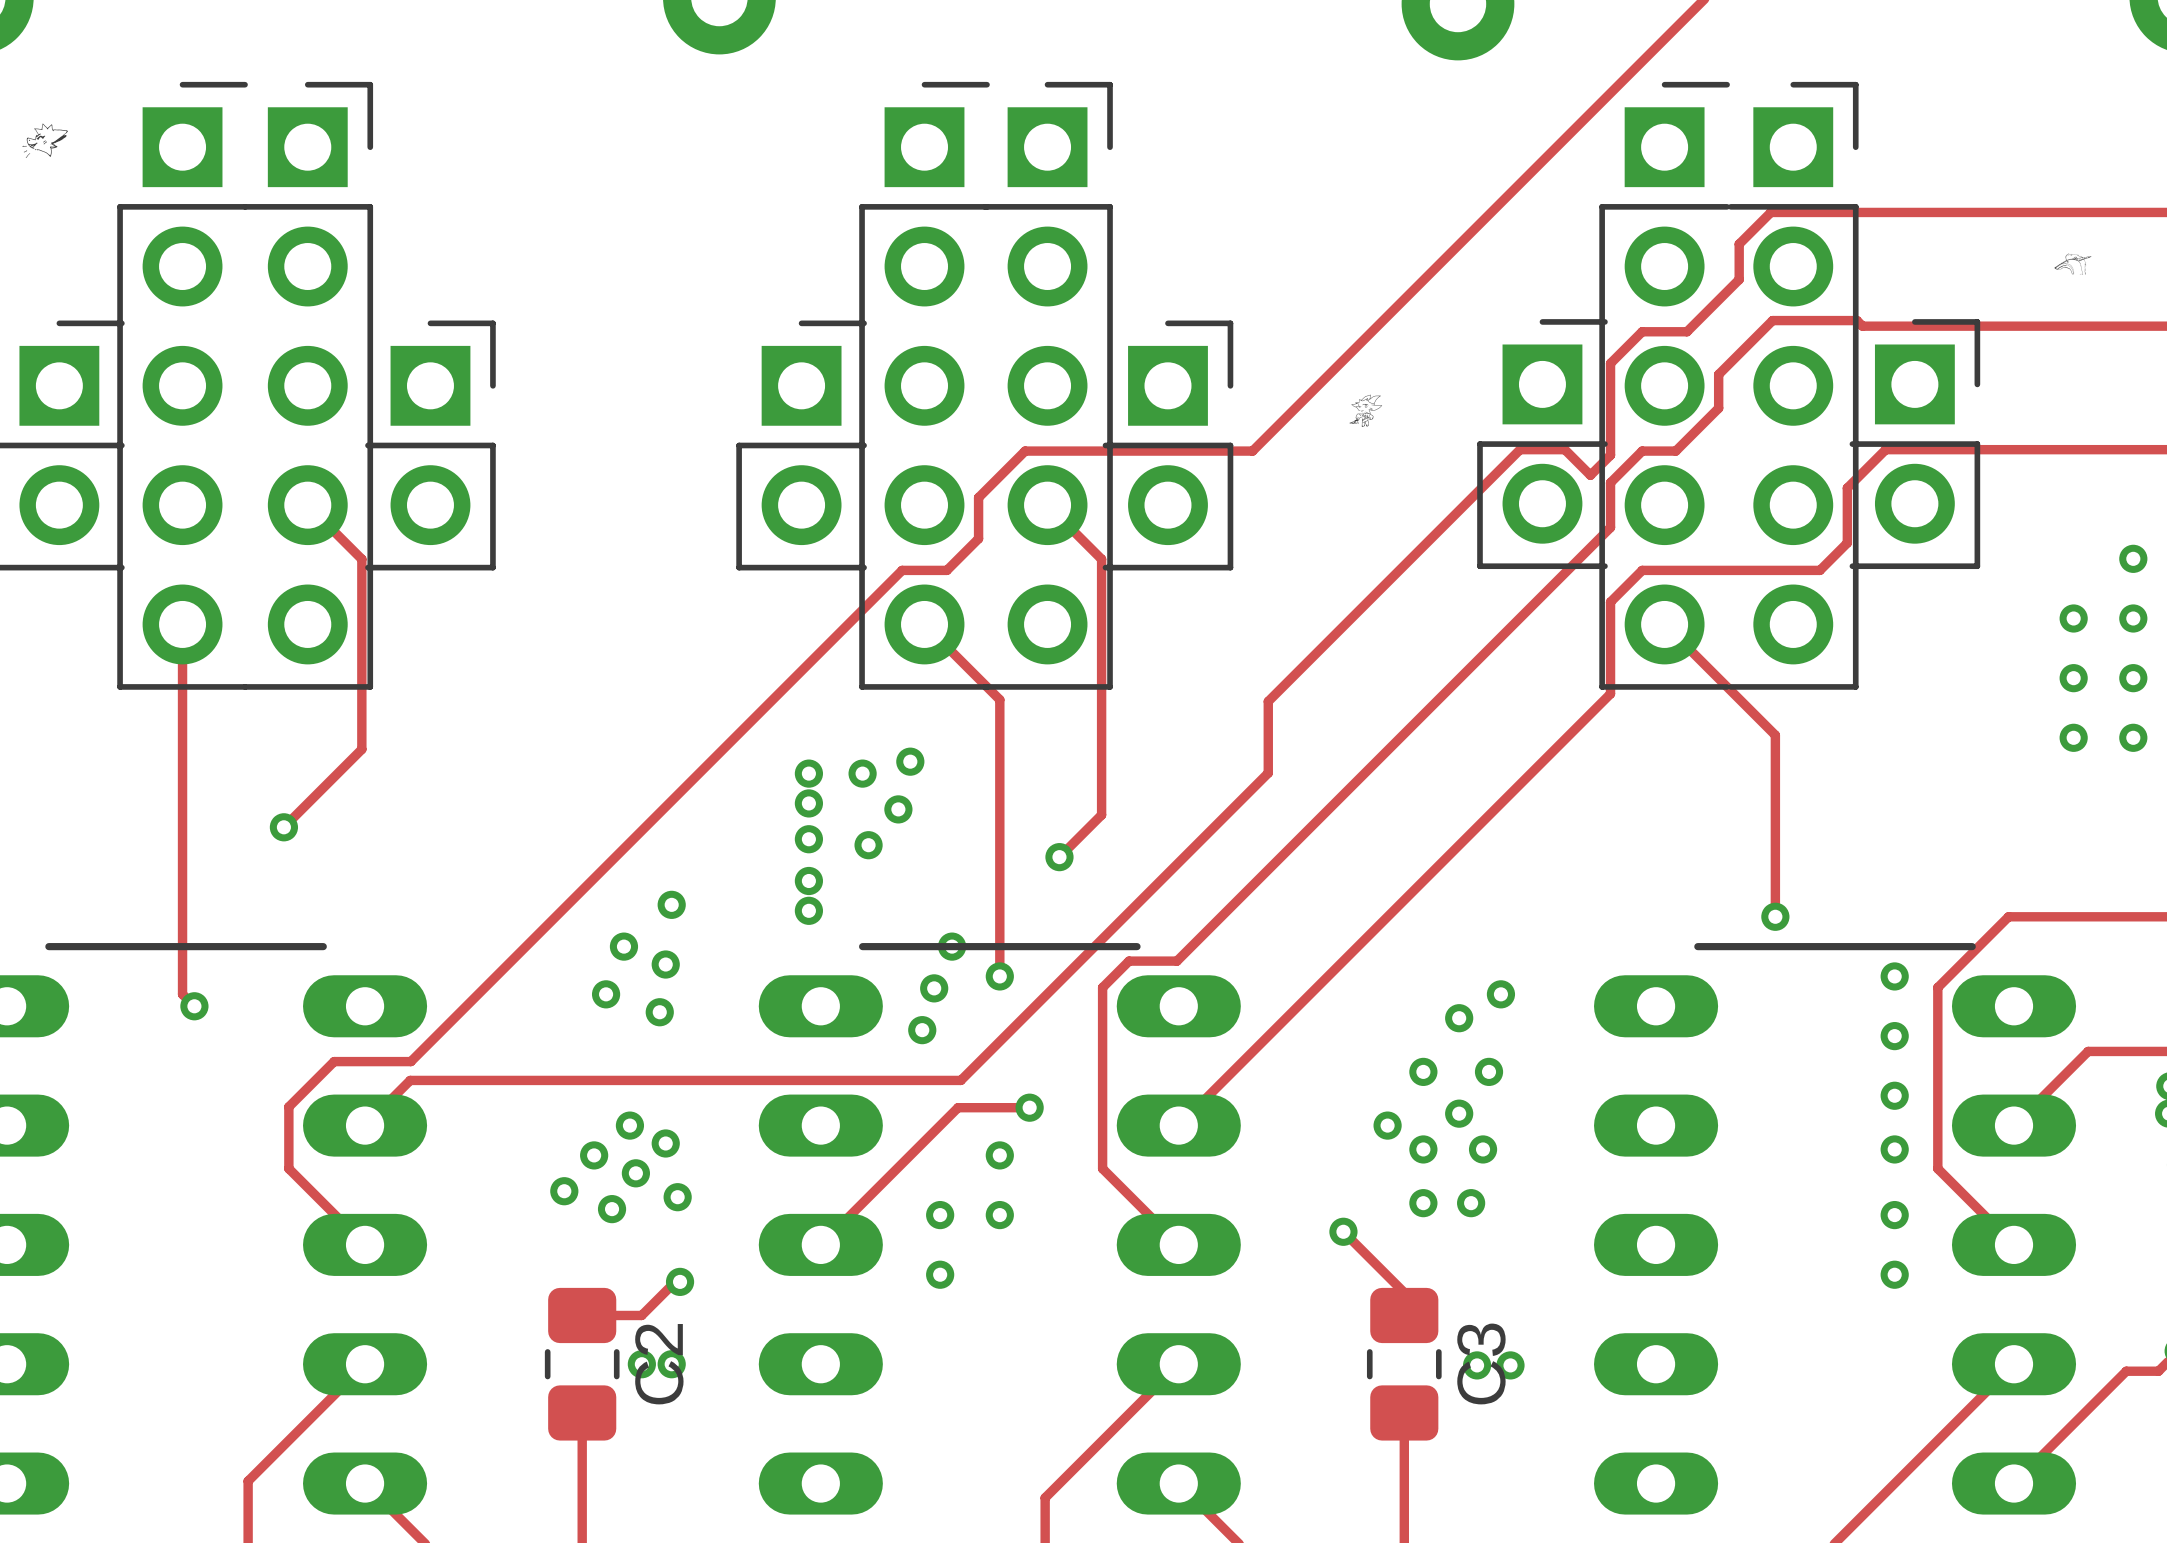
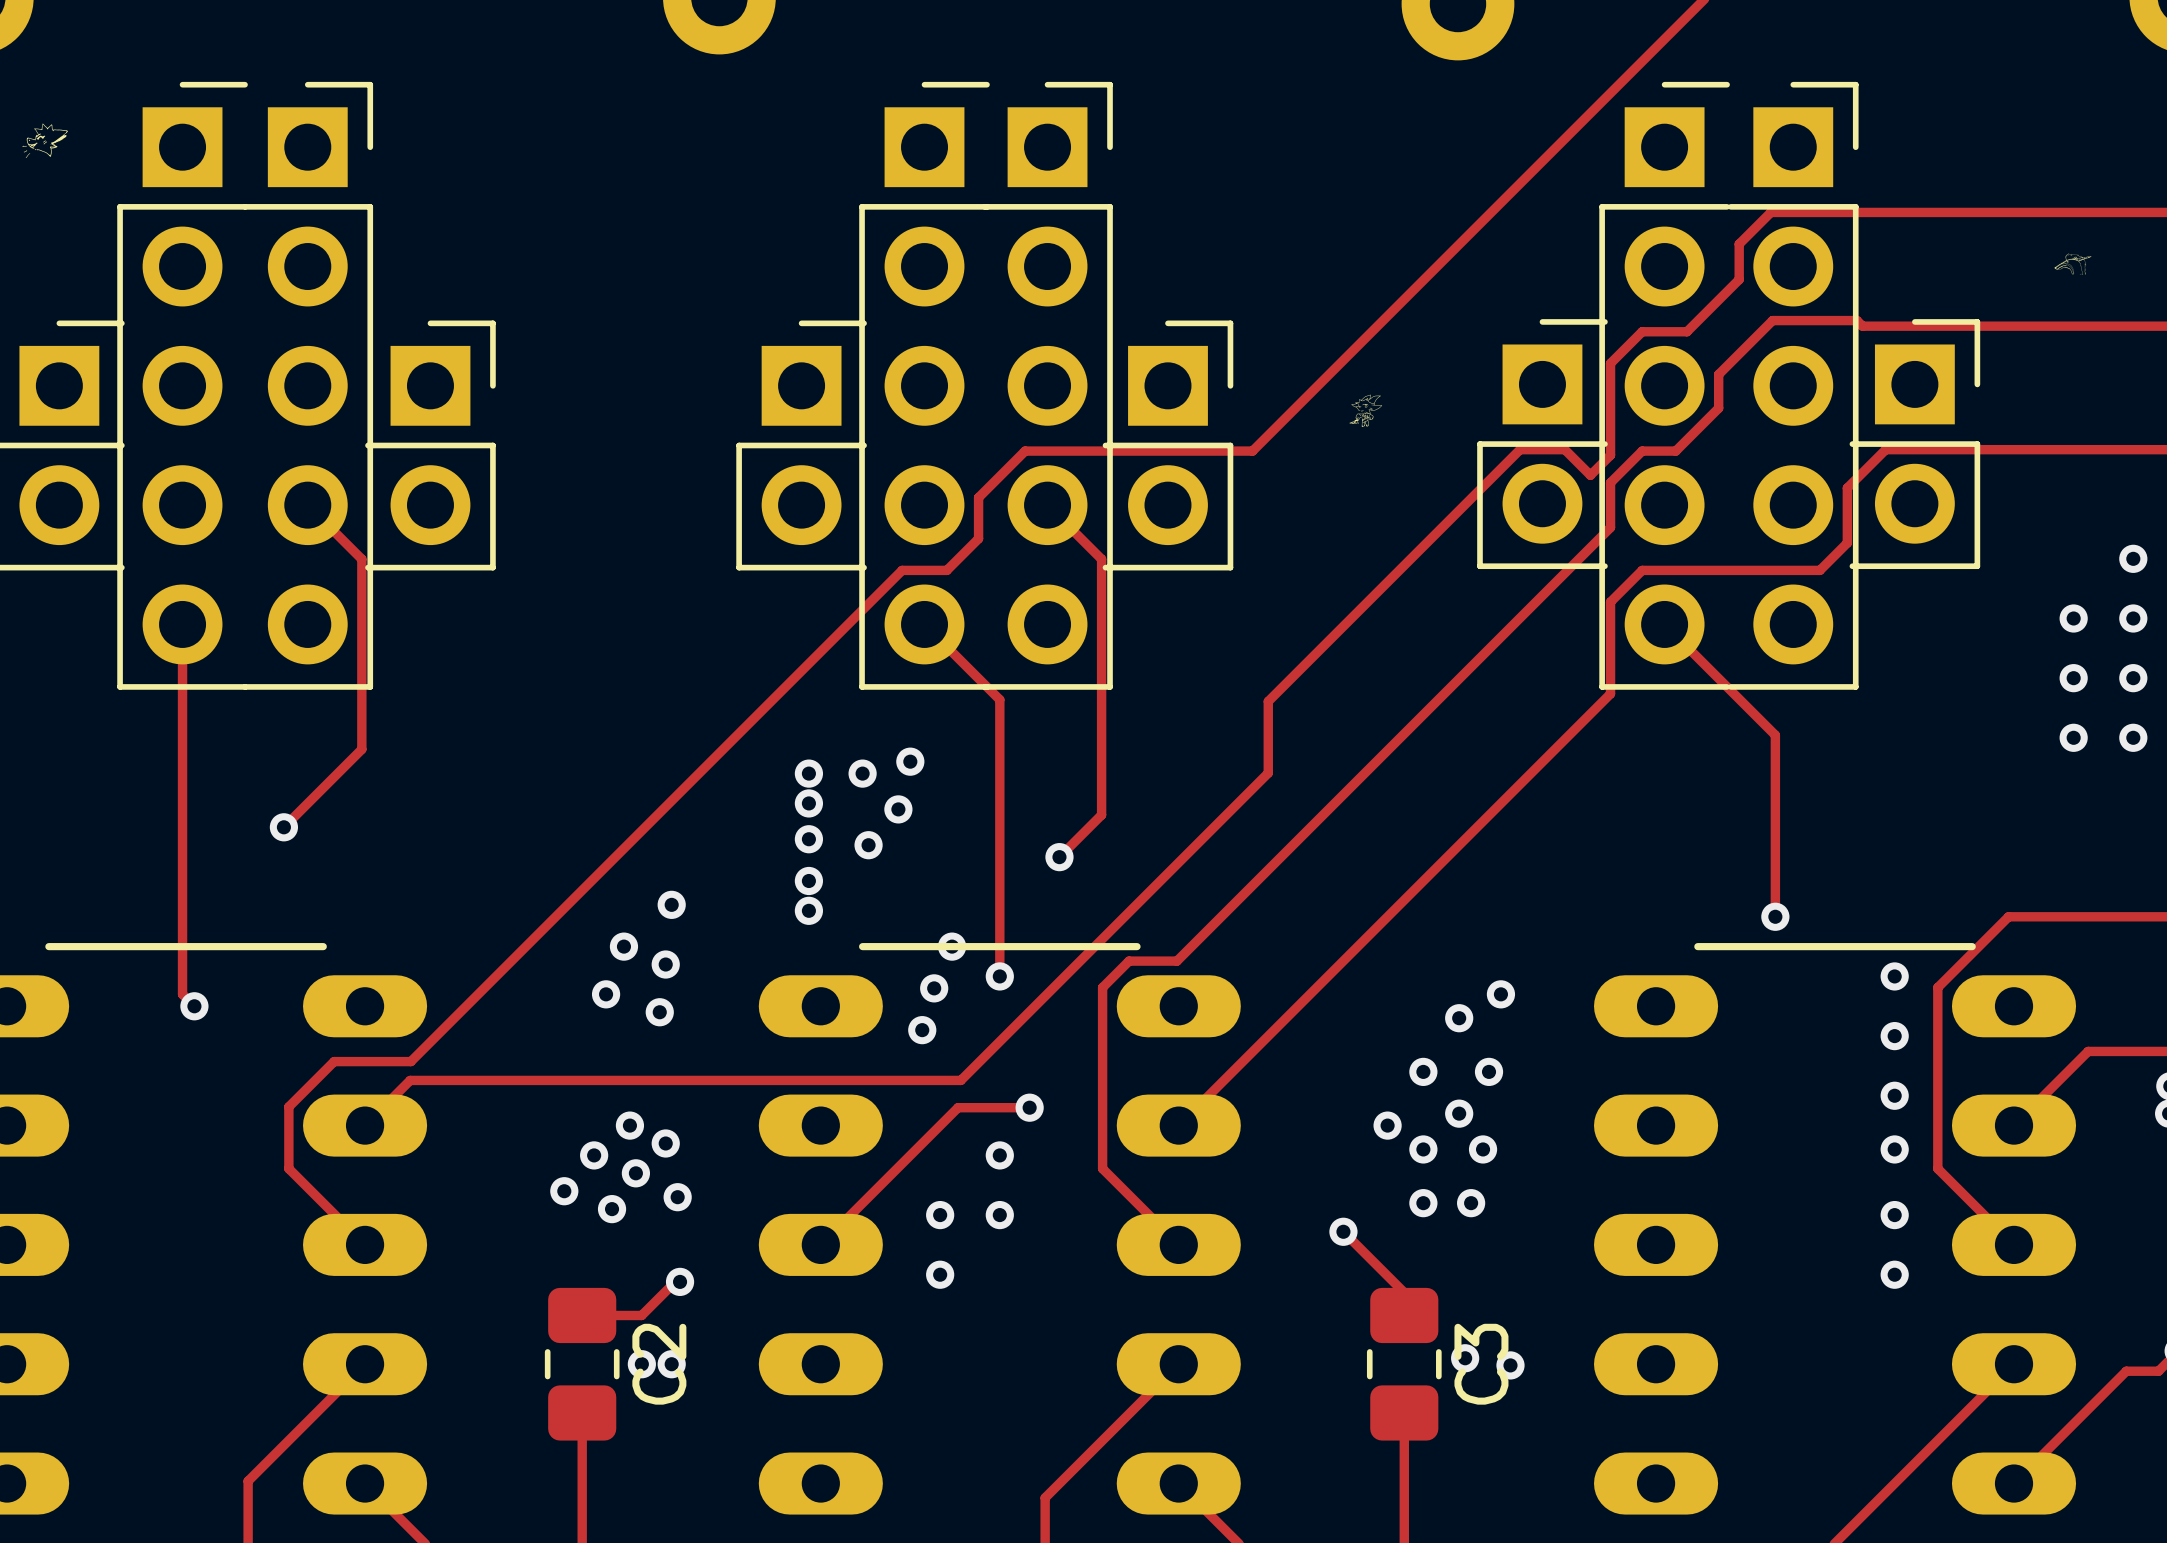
via position: (1477, 1365) -> (1465, 1358)

